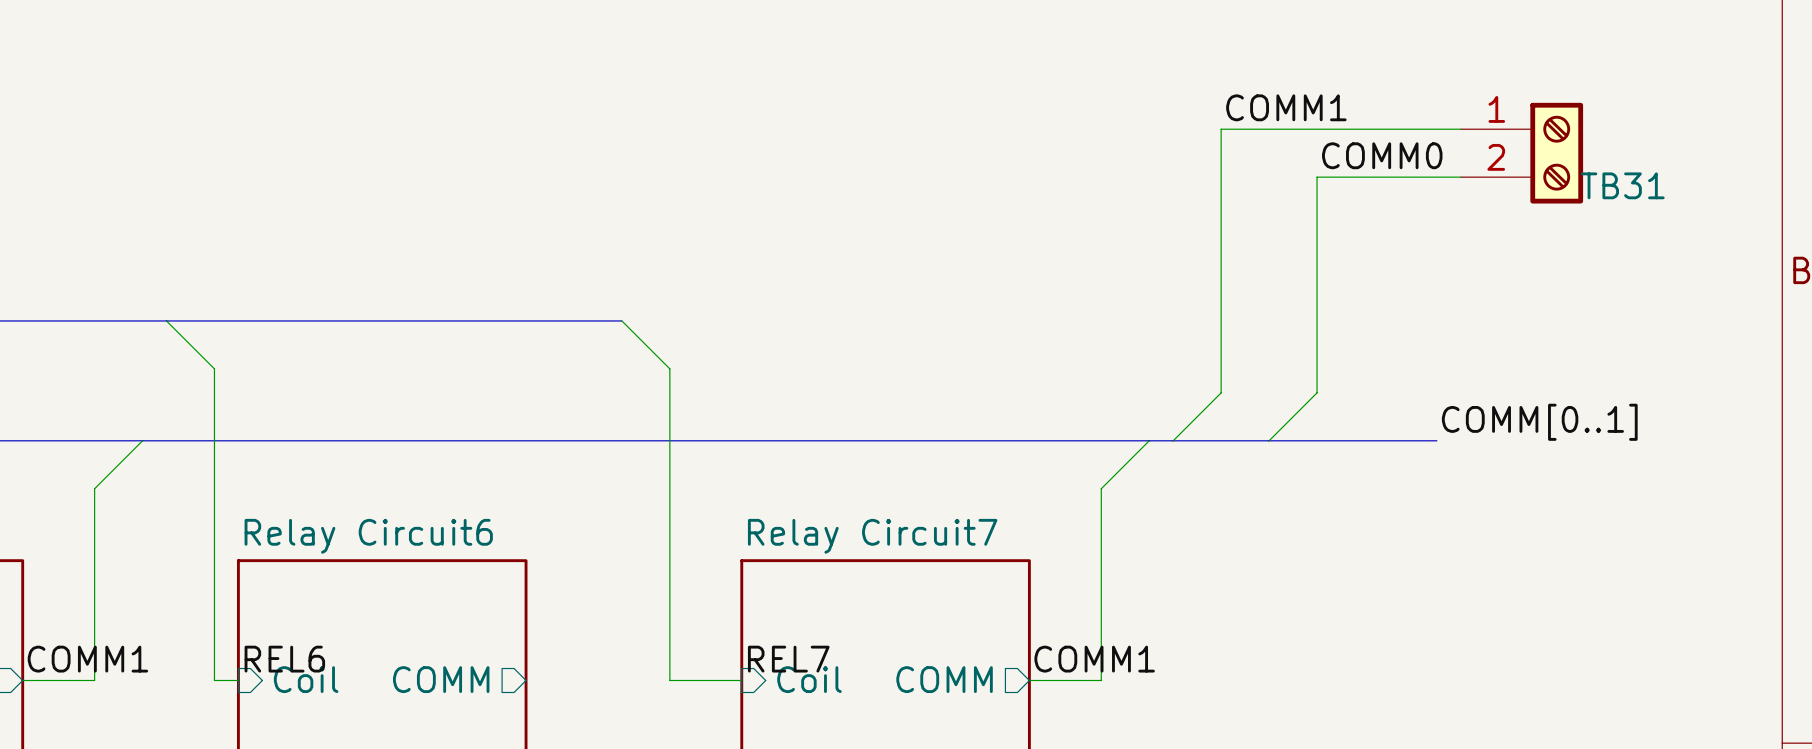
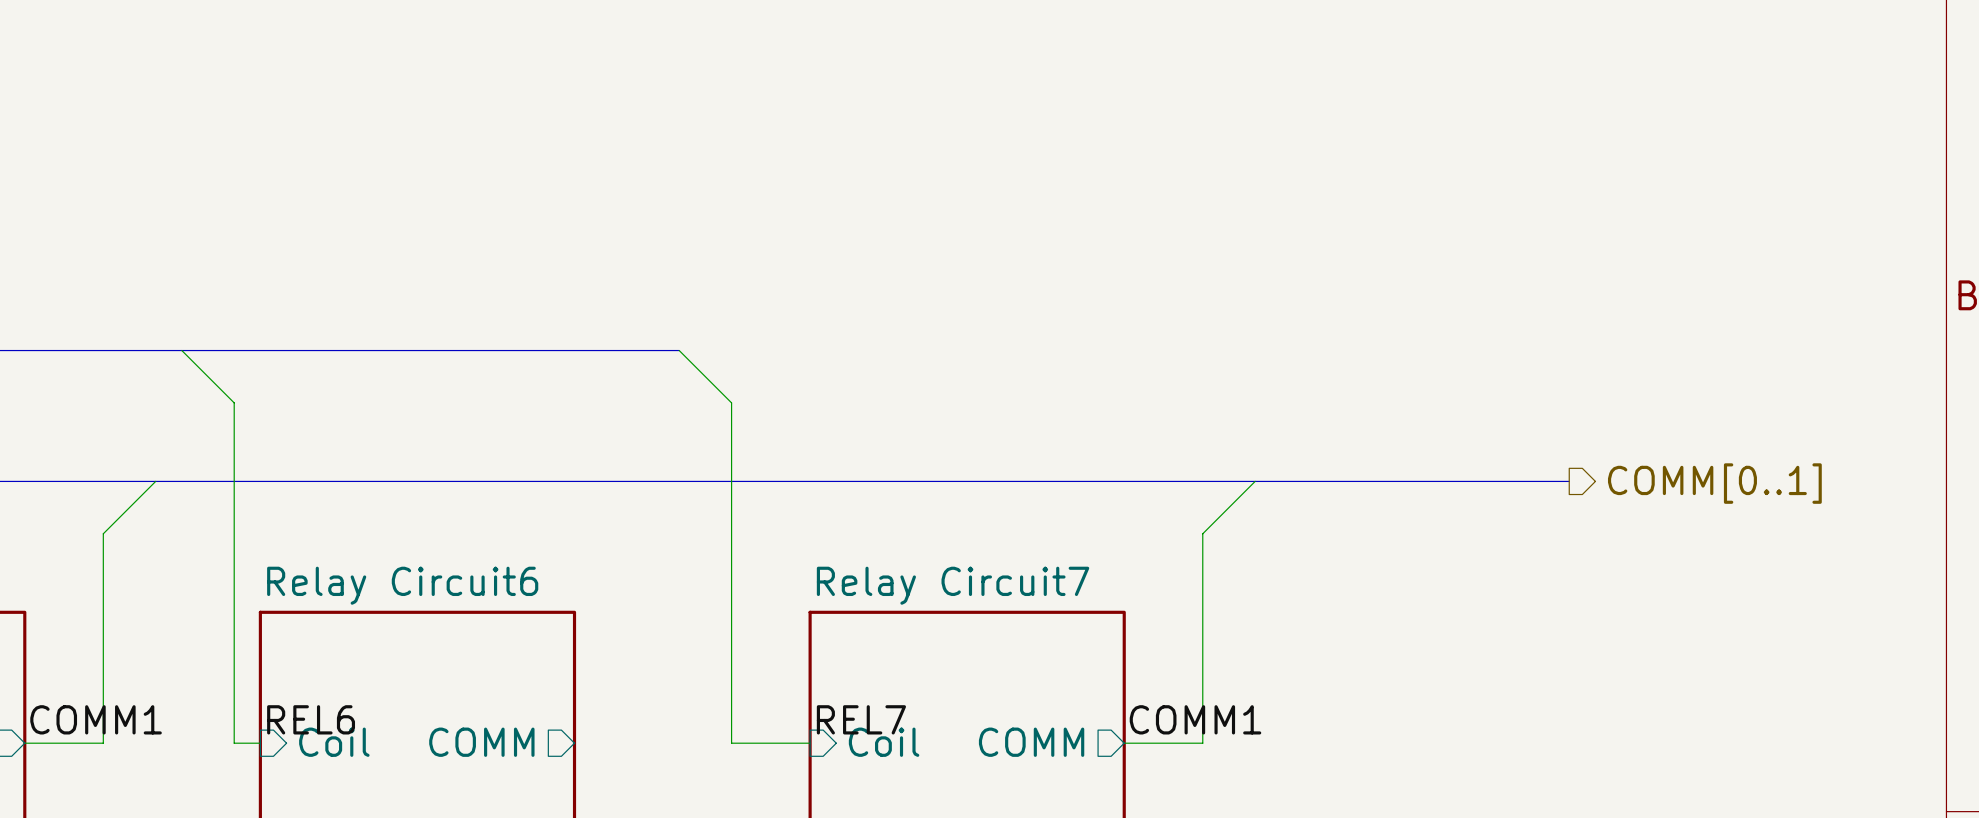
label: COMM1 (1286, 107) -> none
wire: (1460, 129) (1221, 129) (1221, 392) (1173, 440) -> none
TB31: (1521, 153) -> none
label: COMM0 (1382, 155) -> none
wire: (1460, 177) (1317, 177) (1317, 392) (1269, 440) -> none
label: COMM[0..1] (1539, 422) -> none
hierarchical label: none -> COMM[0..1] (1714, 483)

